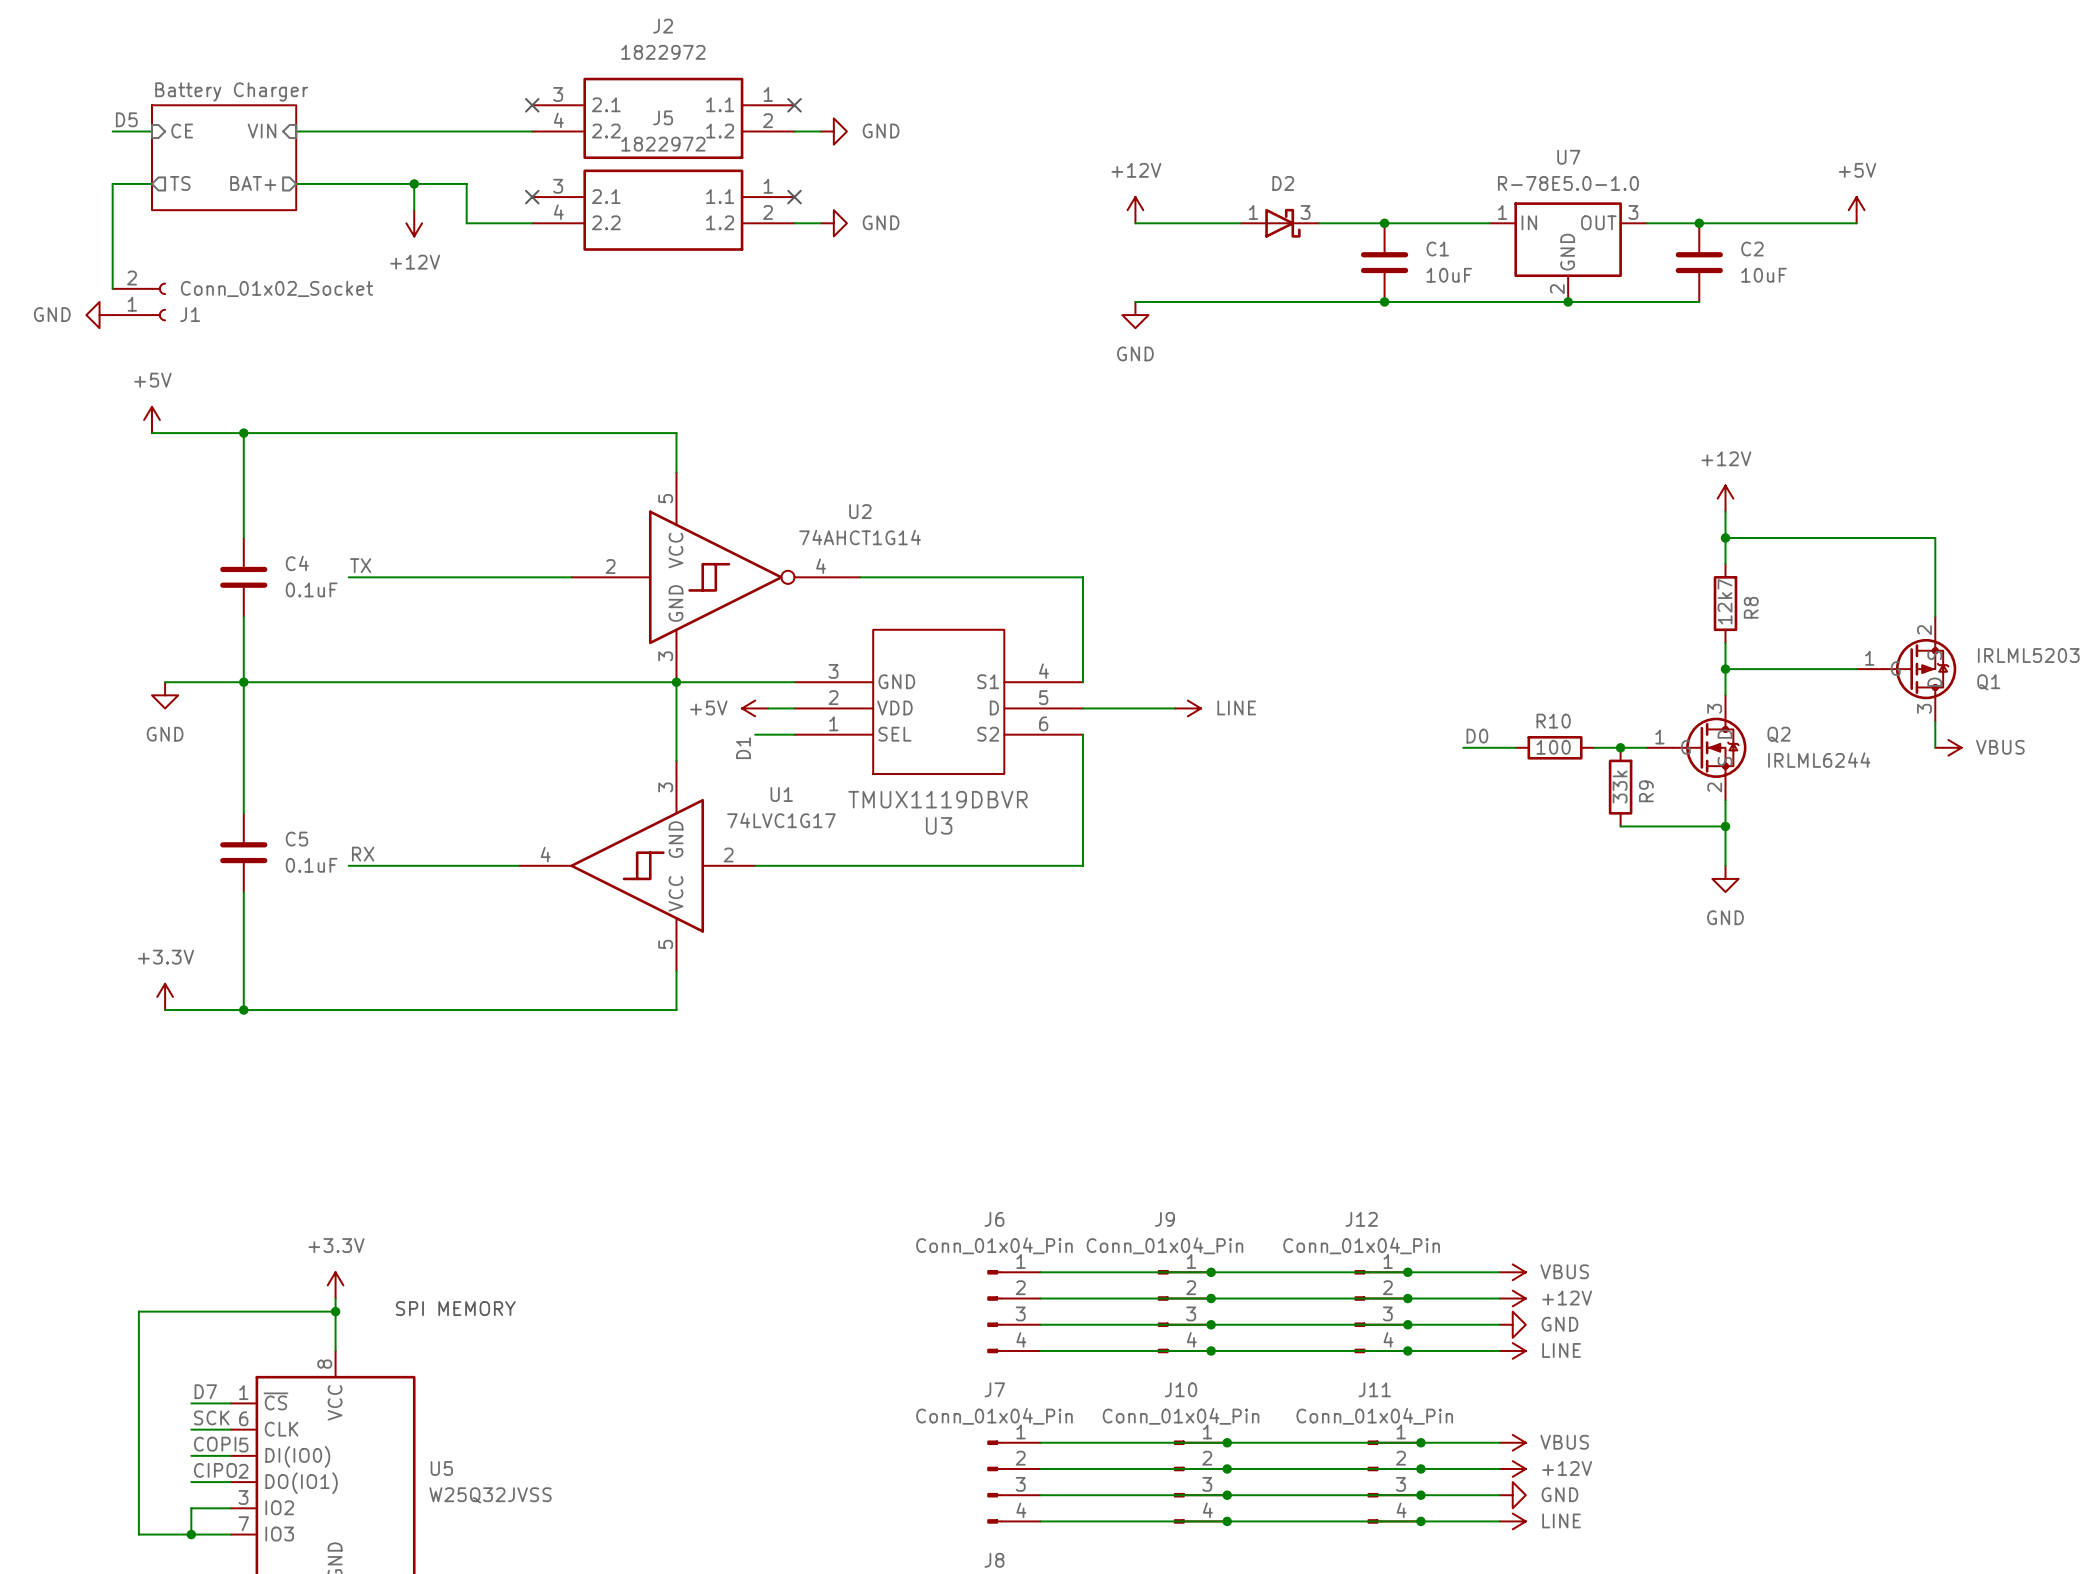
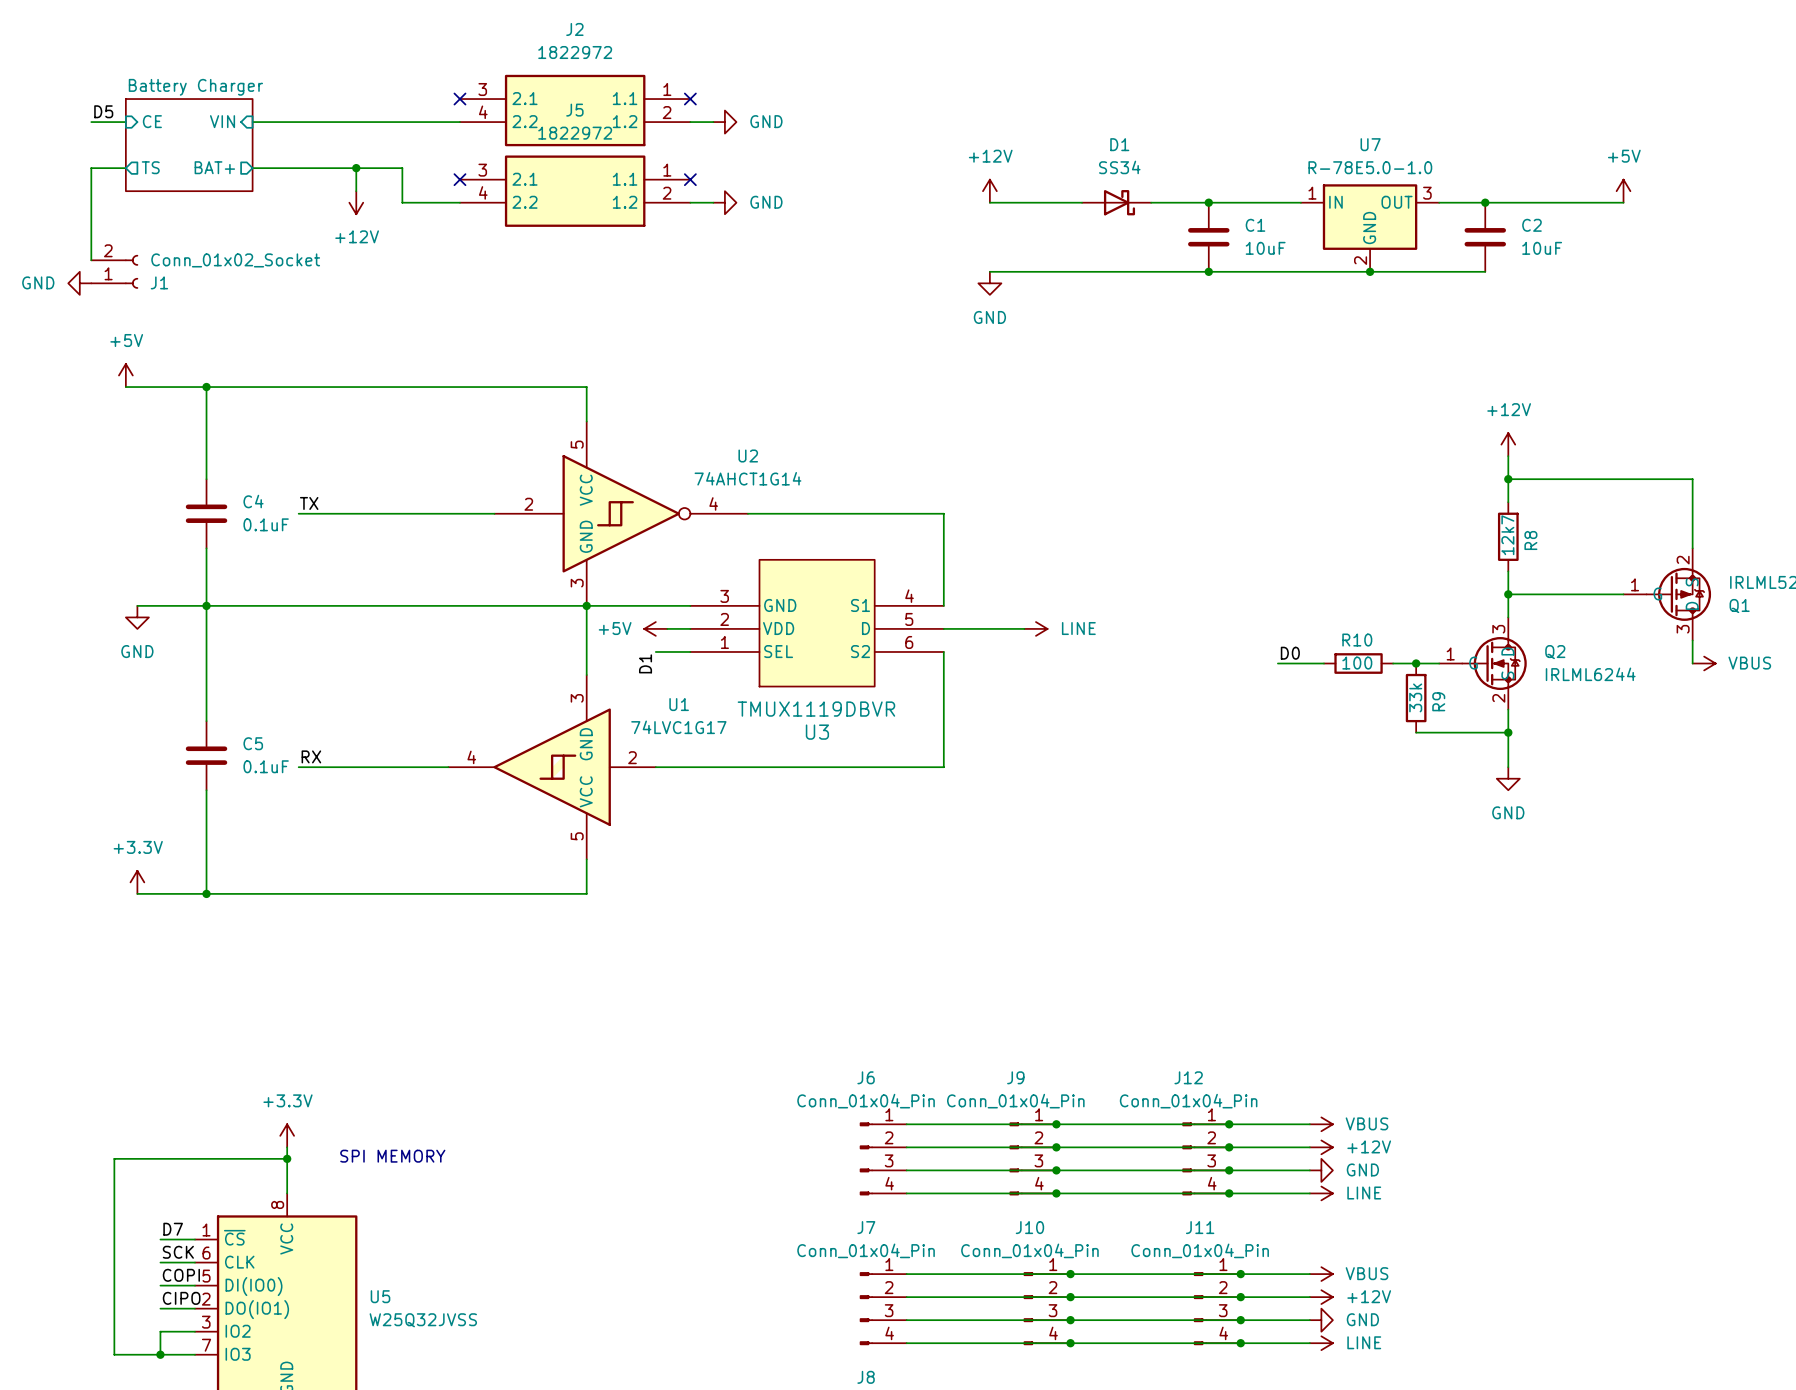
D1 name: none -> D1 (1119, 144)
D1 value: D2 (1283, 183) -> SS34 (1119, 167)
D1 pin number: 1 (1253, 212) -> none
D1 pin number: 3 (1305, 212) -> none

